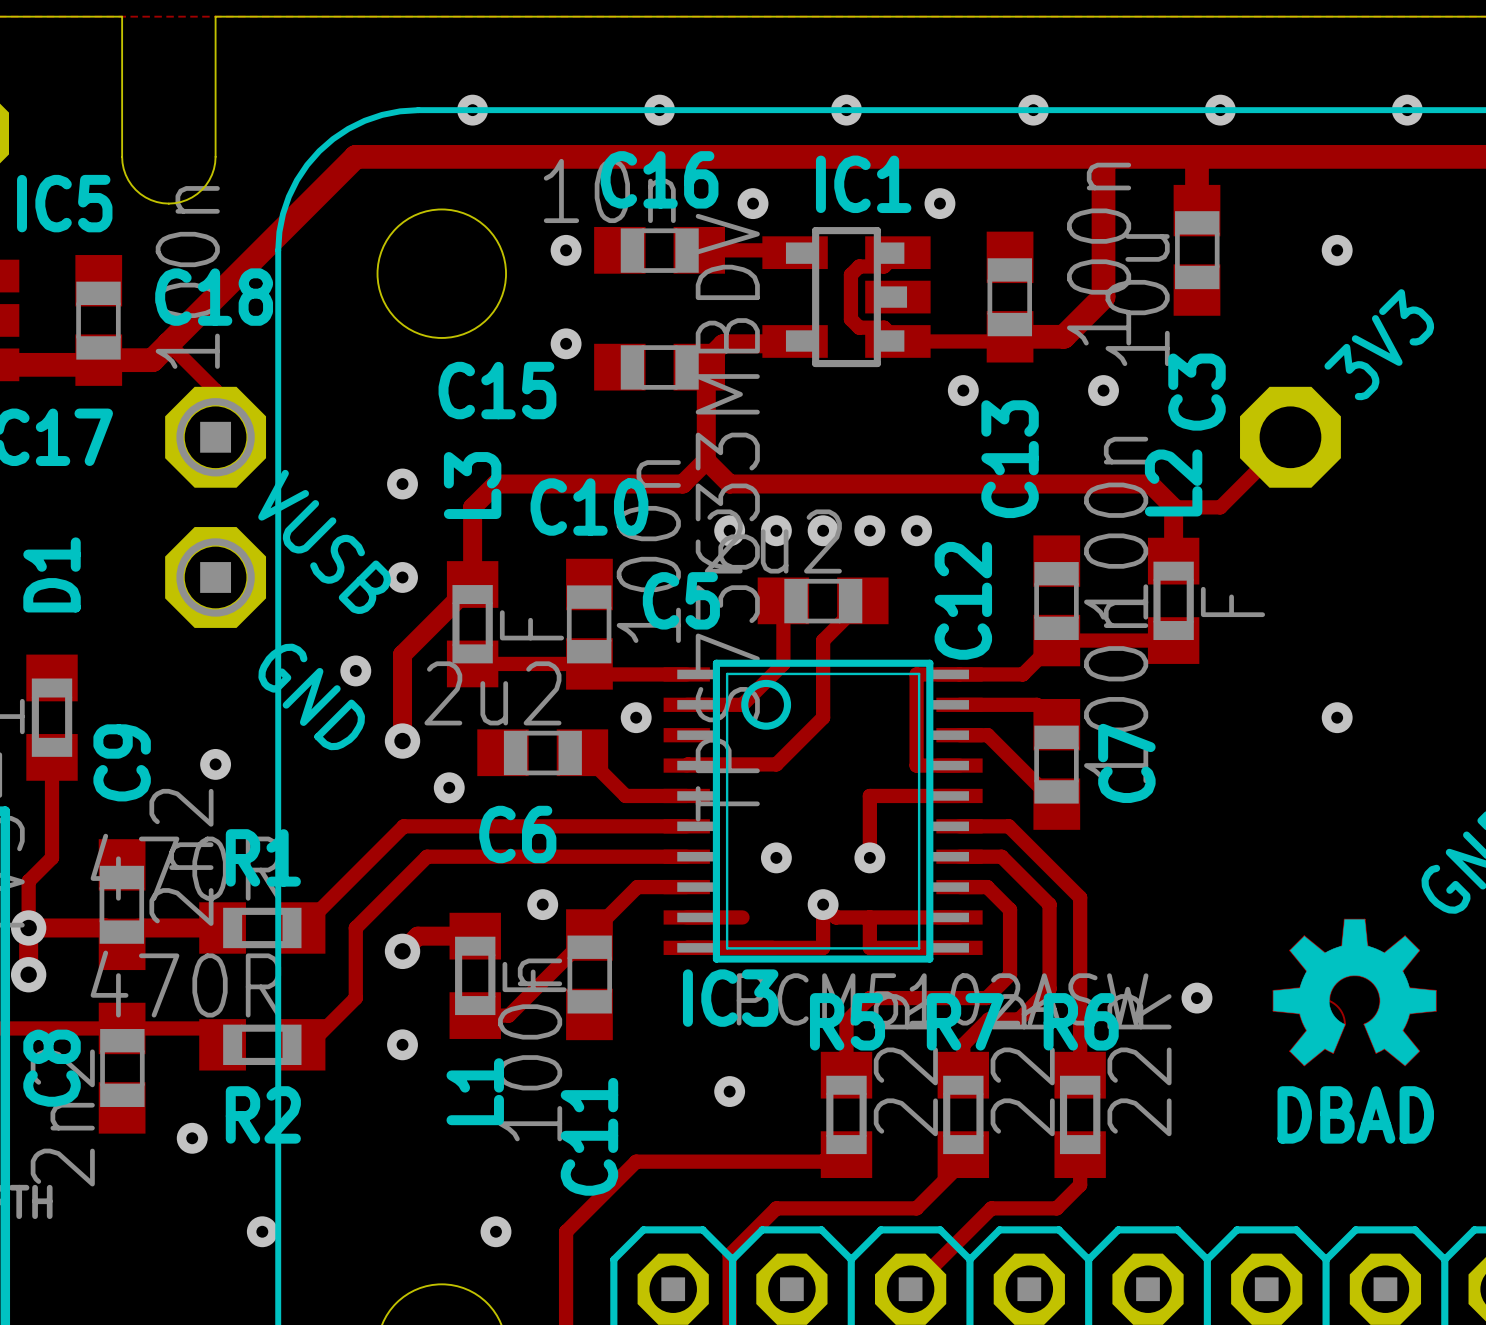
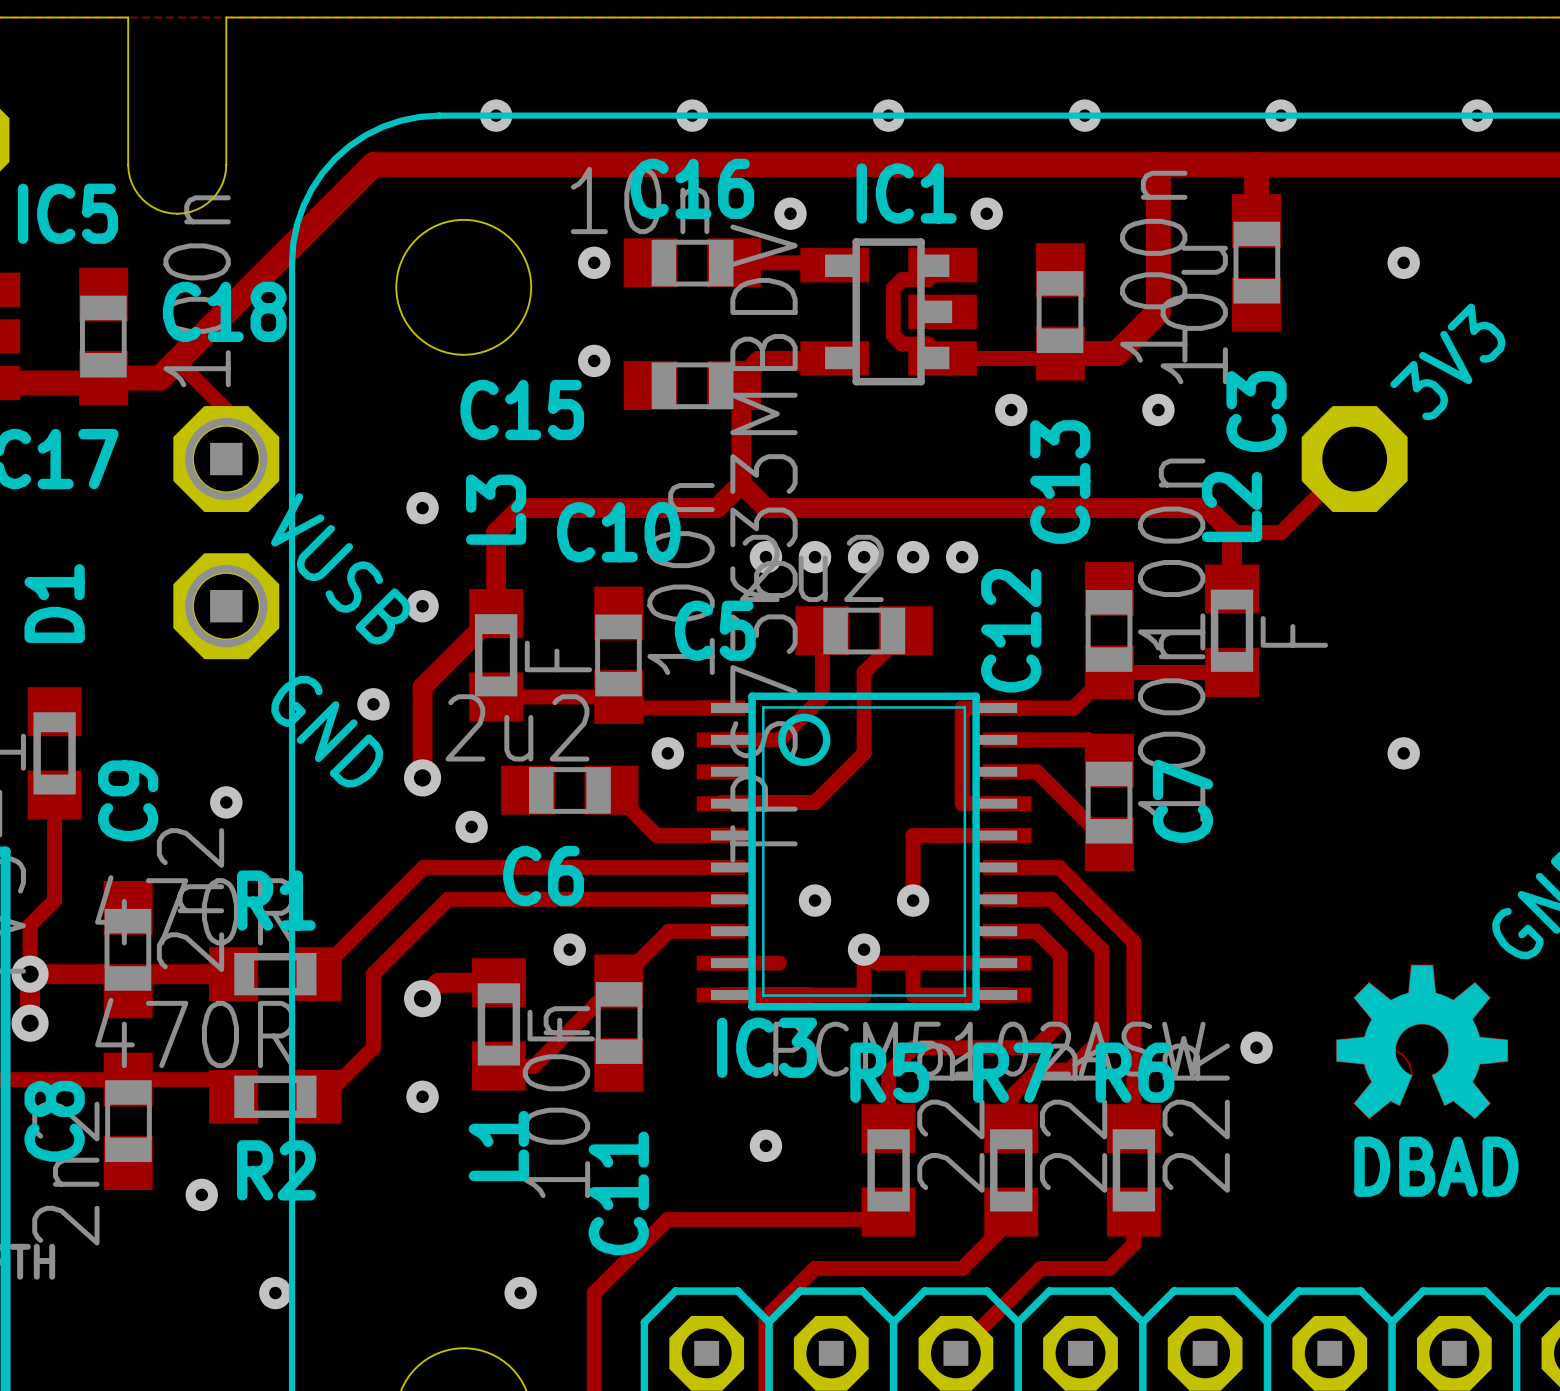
text position: DBAD (1355, 1114) -> DBAD (1436, 1166)

